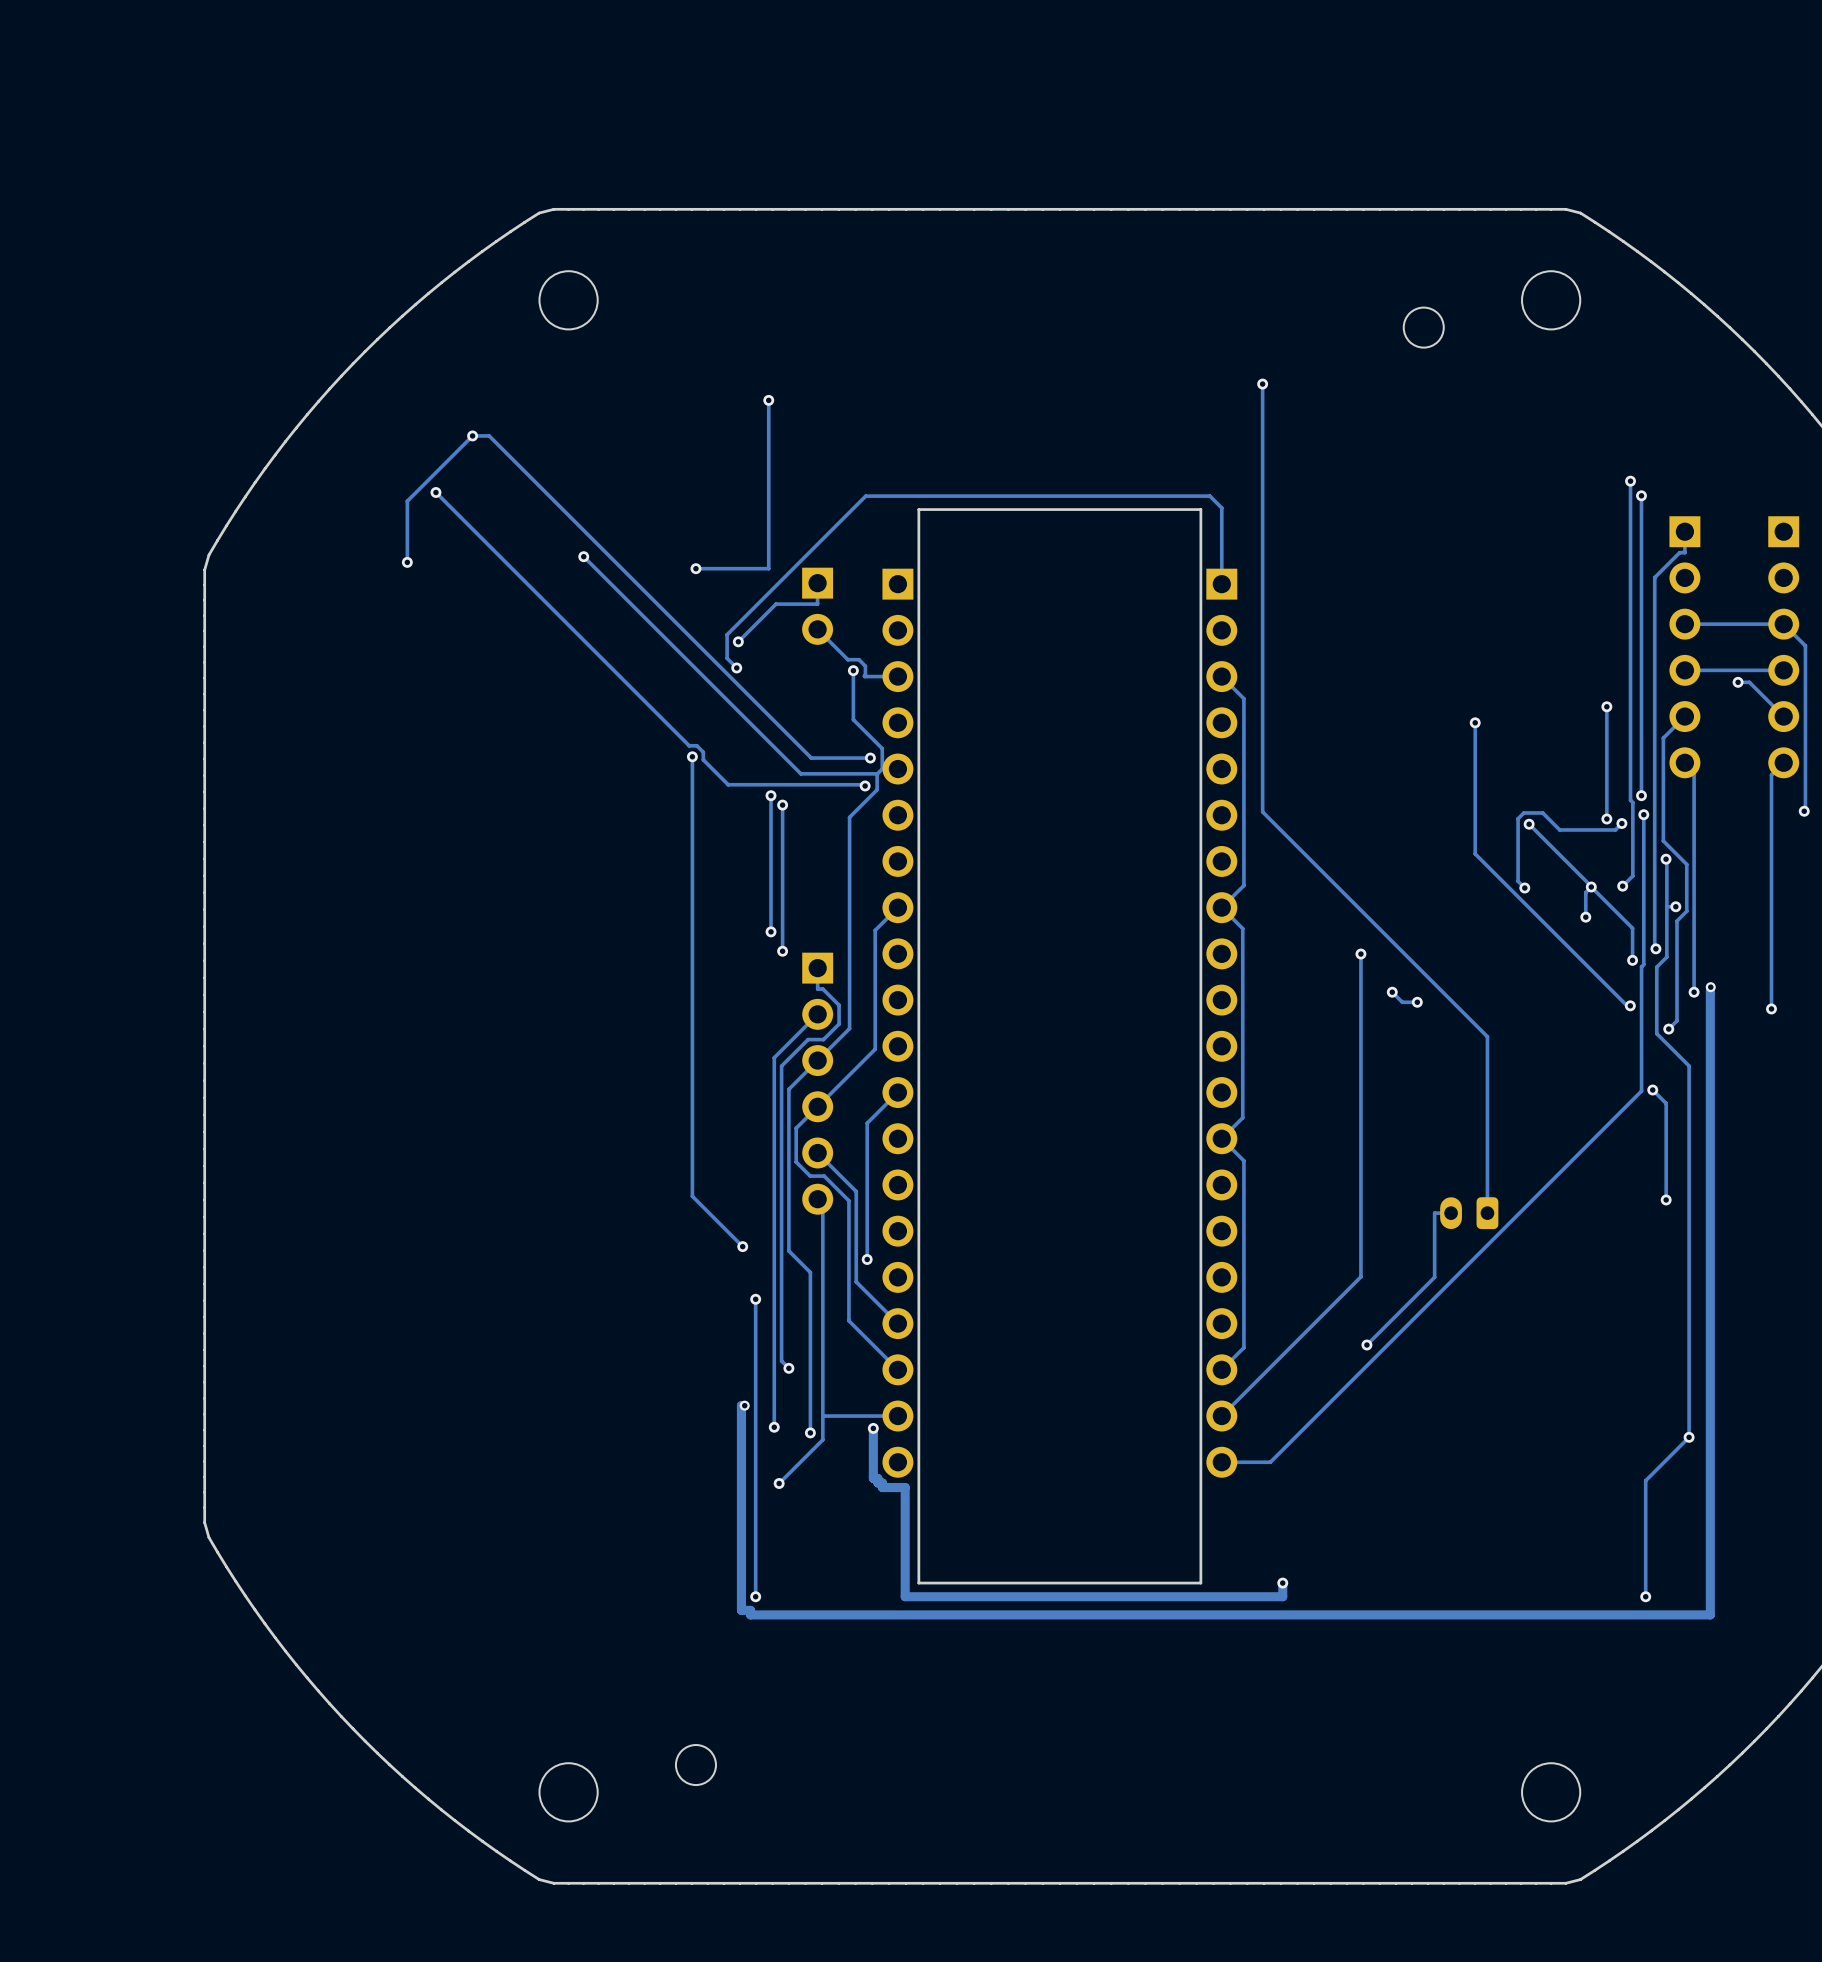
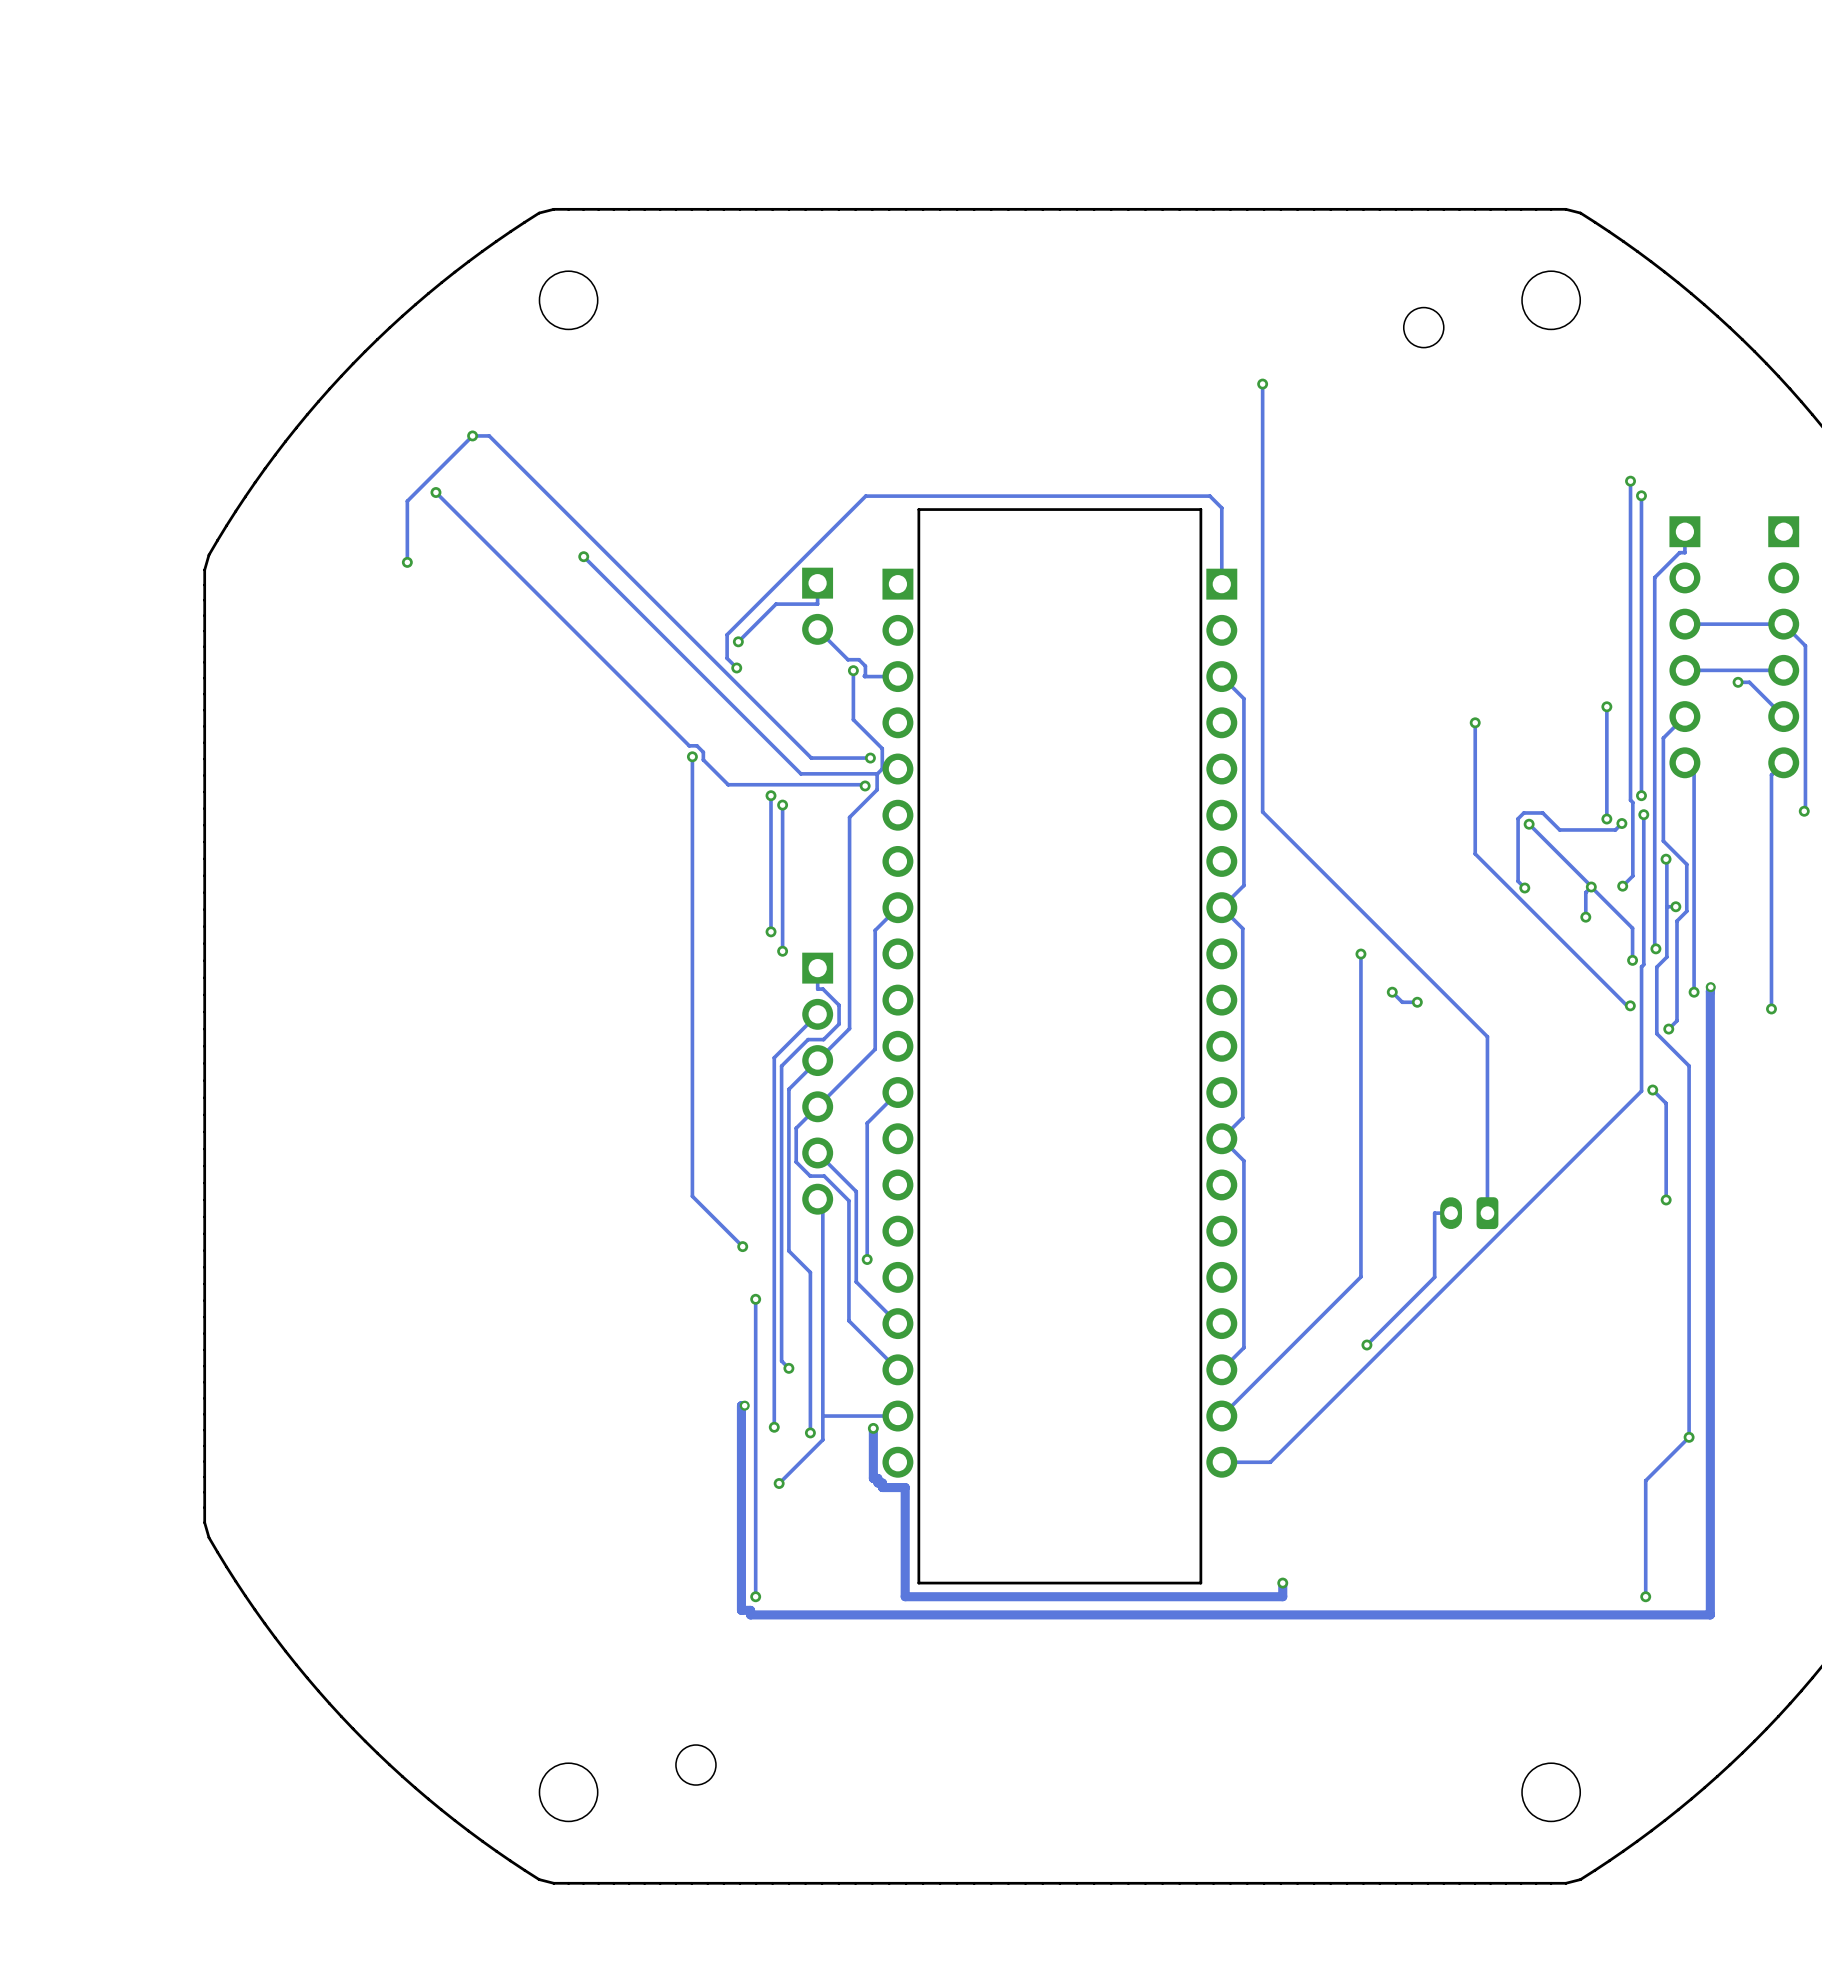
track: (768, 400) (768, 568) (695, 568) -> none
via: (768, 400) -> none
via: (695, 568) -> none

